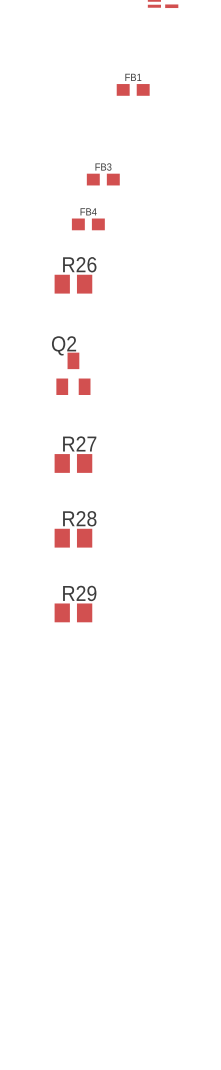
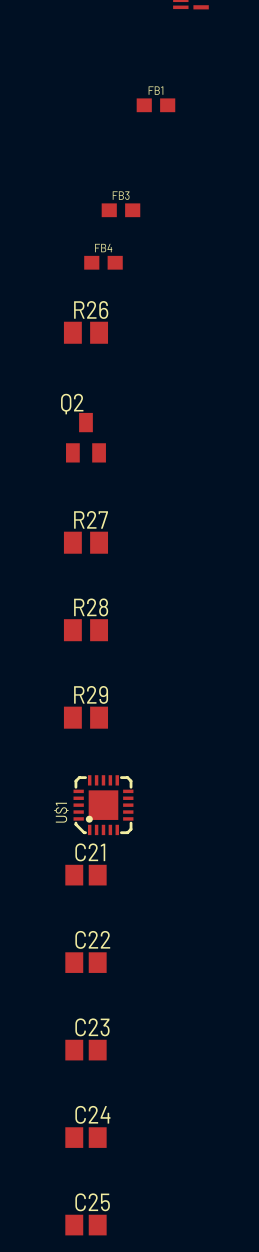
U$1: none -> (103, 805)
C21: none -> (85, 875)
C22: none -> (85, 962)
C23: none -> (85, 1050)
C24: none -> (85, 1137)
C25: none -> (85, 1225)

